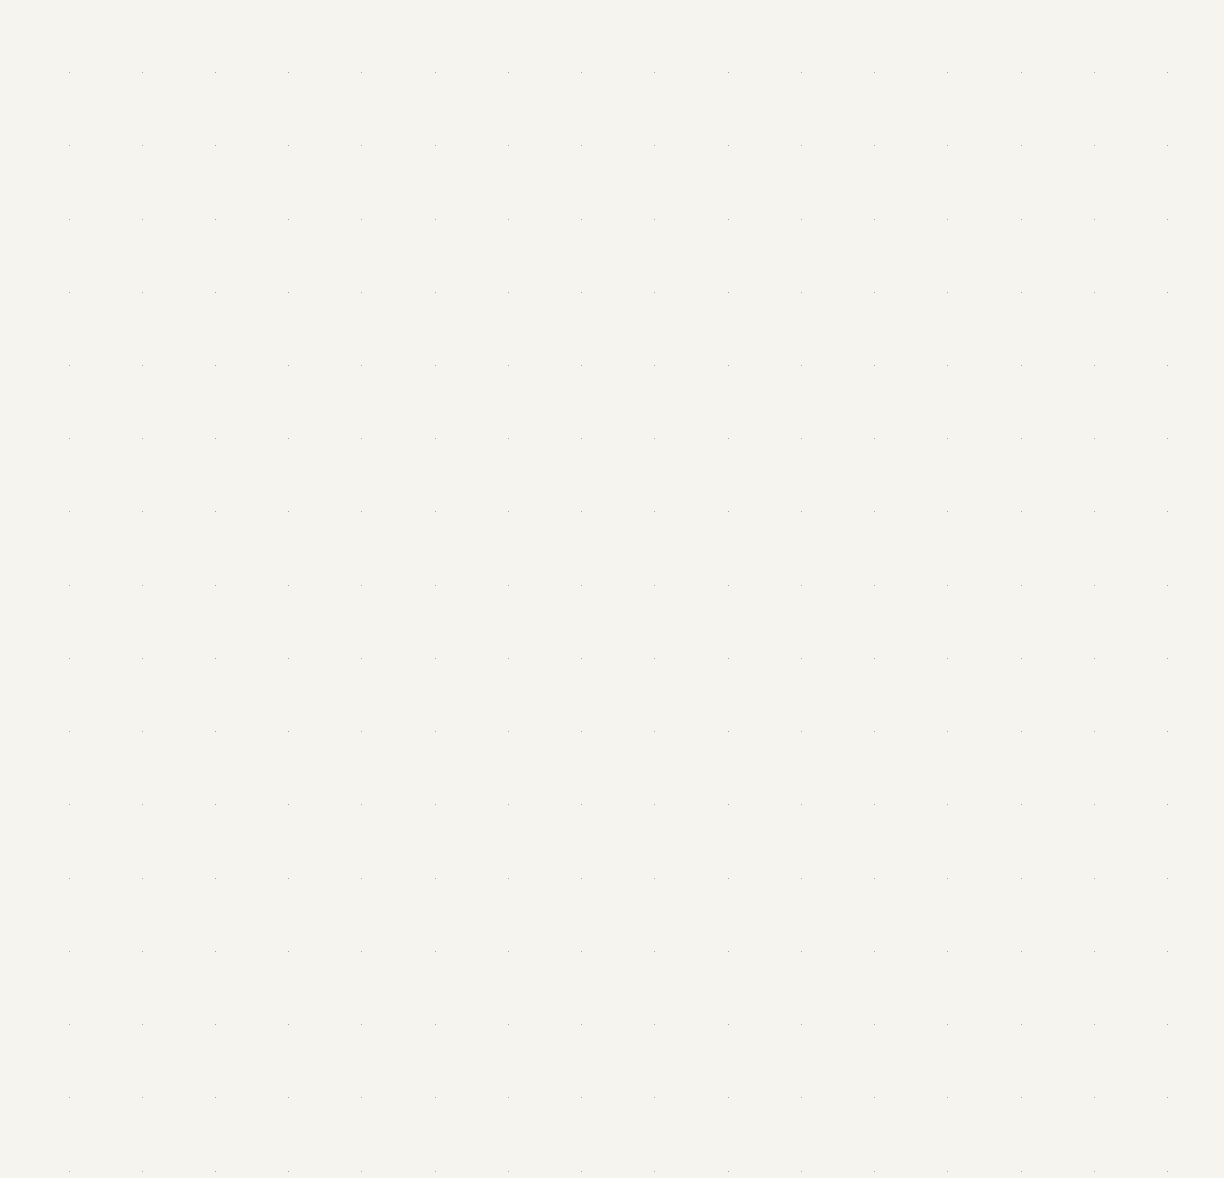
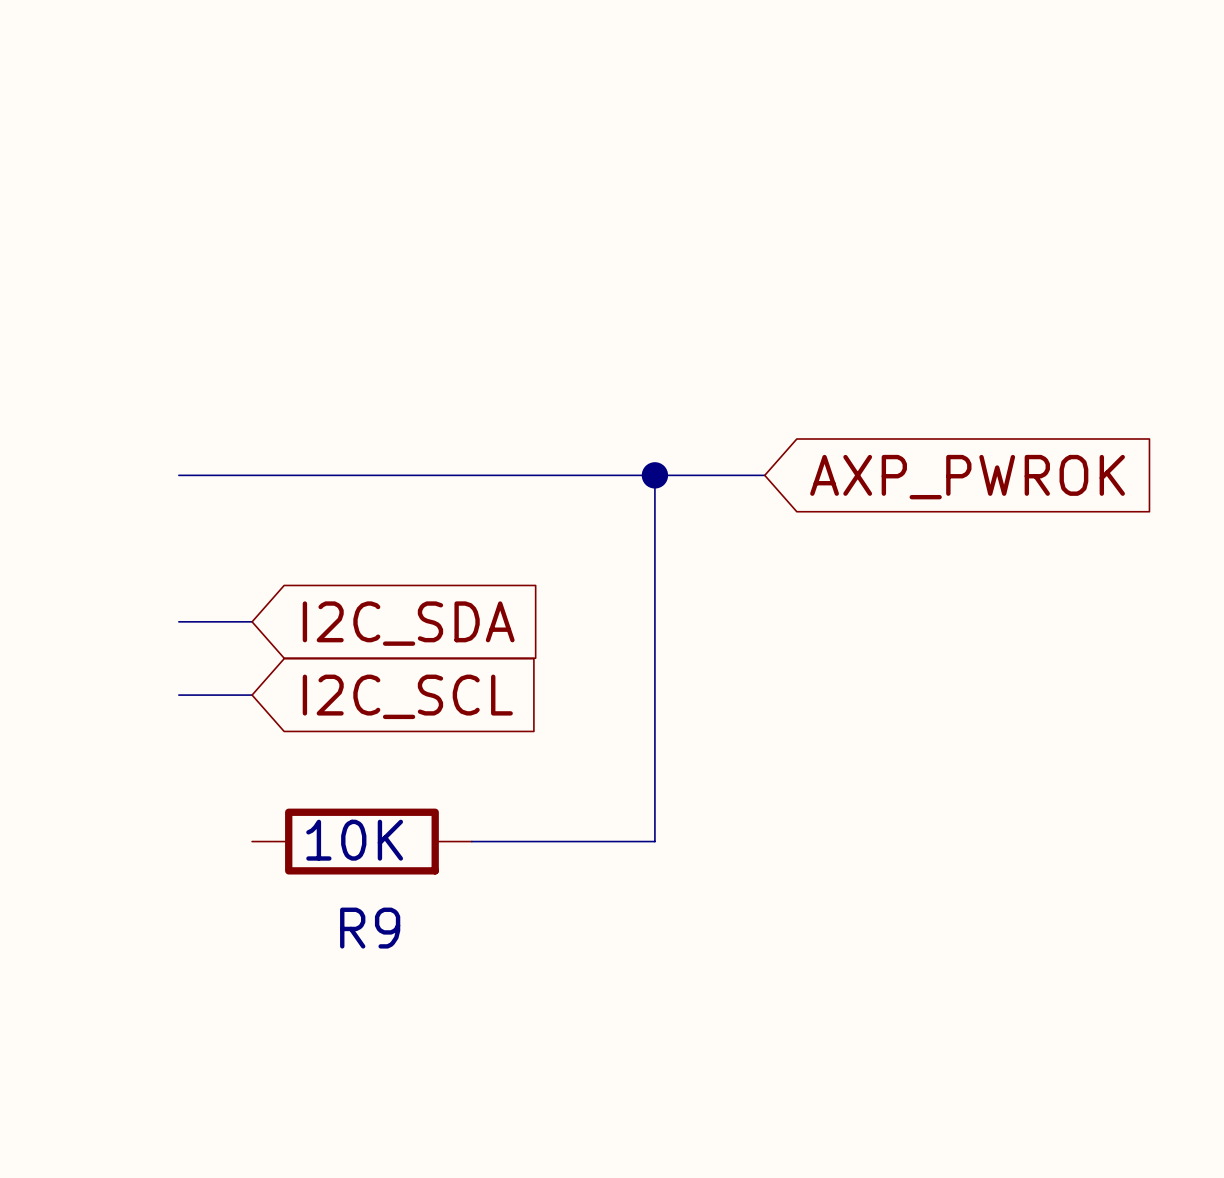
wire: none -> (178, 475) (764, 475)
wire: none -> (654, 475) (654, 841) (471, 841)
junction: none -> (654, 475)
global label: none -> AXP_PWROK (967, 477)
wire: none -> (178, 621) (252, 621)
global label: none -> I2C_SDA (408, 623)
wire: none -> (178, 695) (252, 695)
global label: none -> I2C_SCL (407, 696)
R9: none -> 10K (361, 841)

